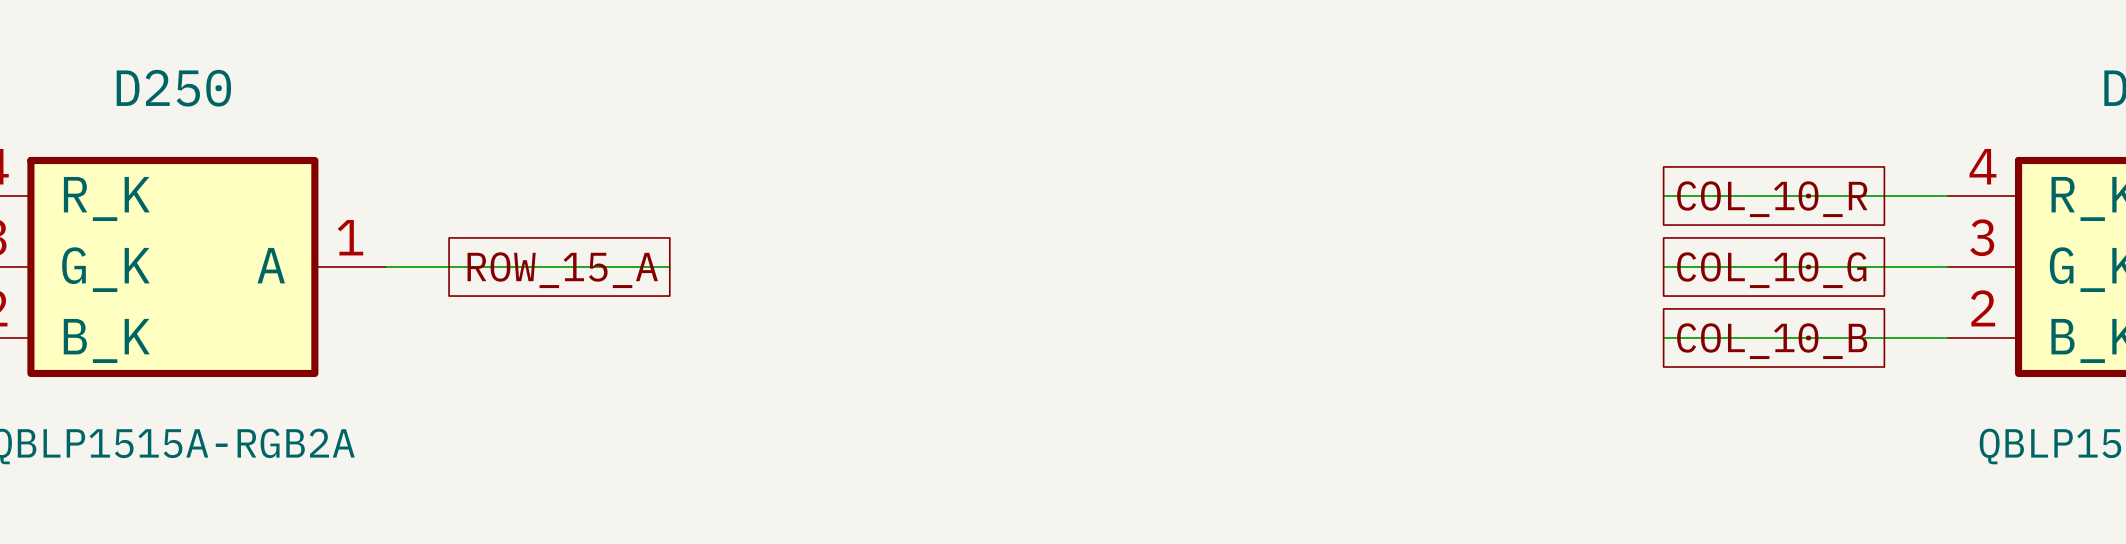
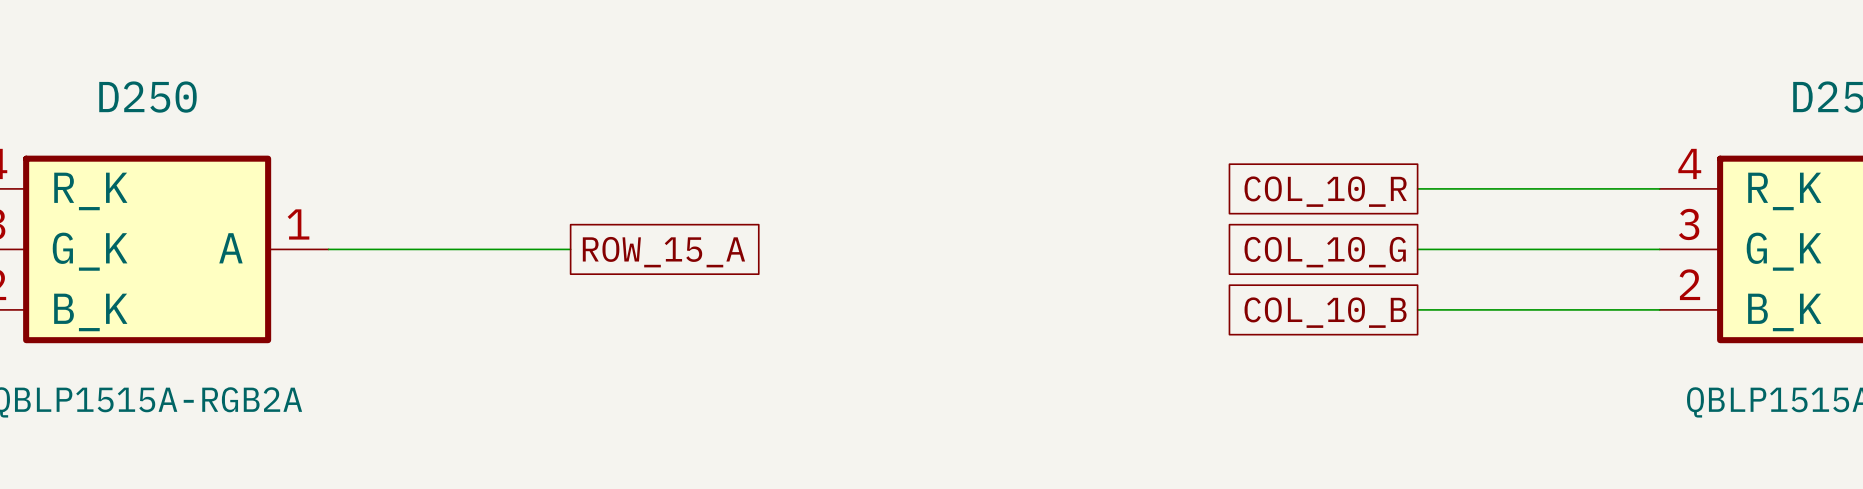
global label rotation: 0° (1772, 199) -> 180° (1325, 191)
global label rotation: 0° (562, 270) -> 180° (663, 252)
global label rotation: 0° (1771, 270) -> 180° (1325, 252)
global label rotation: 0° (1772, 341) -> 180° (1325, 312)
global label position: COL_10_B (1772, 341) -> COL_10_B (1325, 312)

